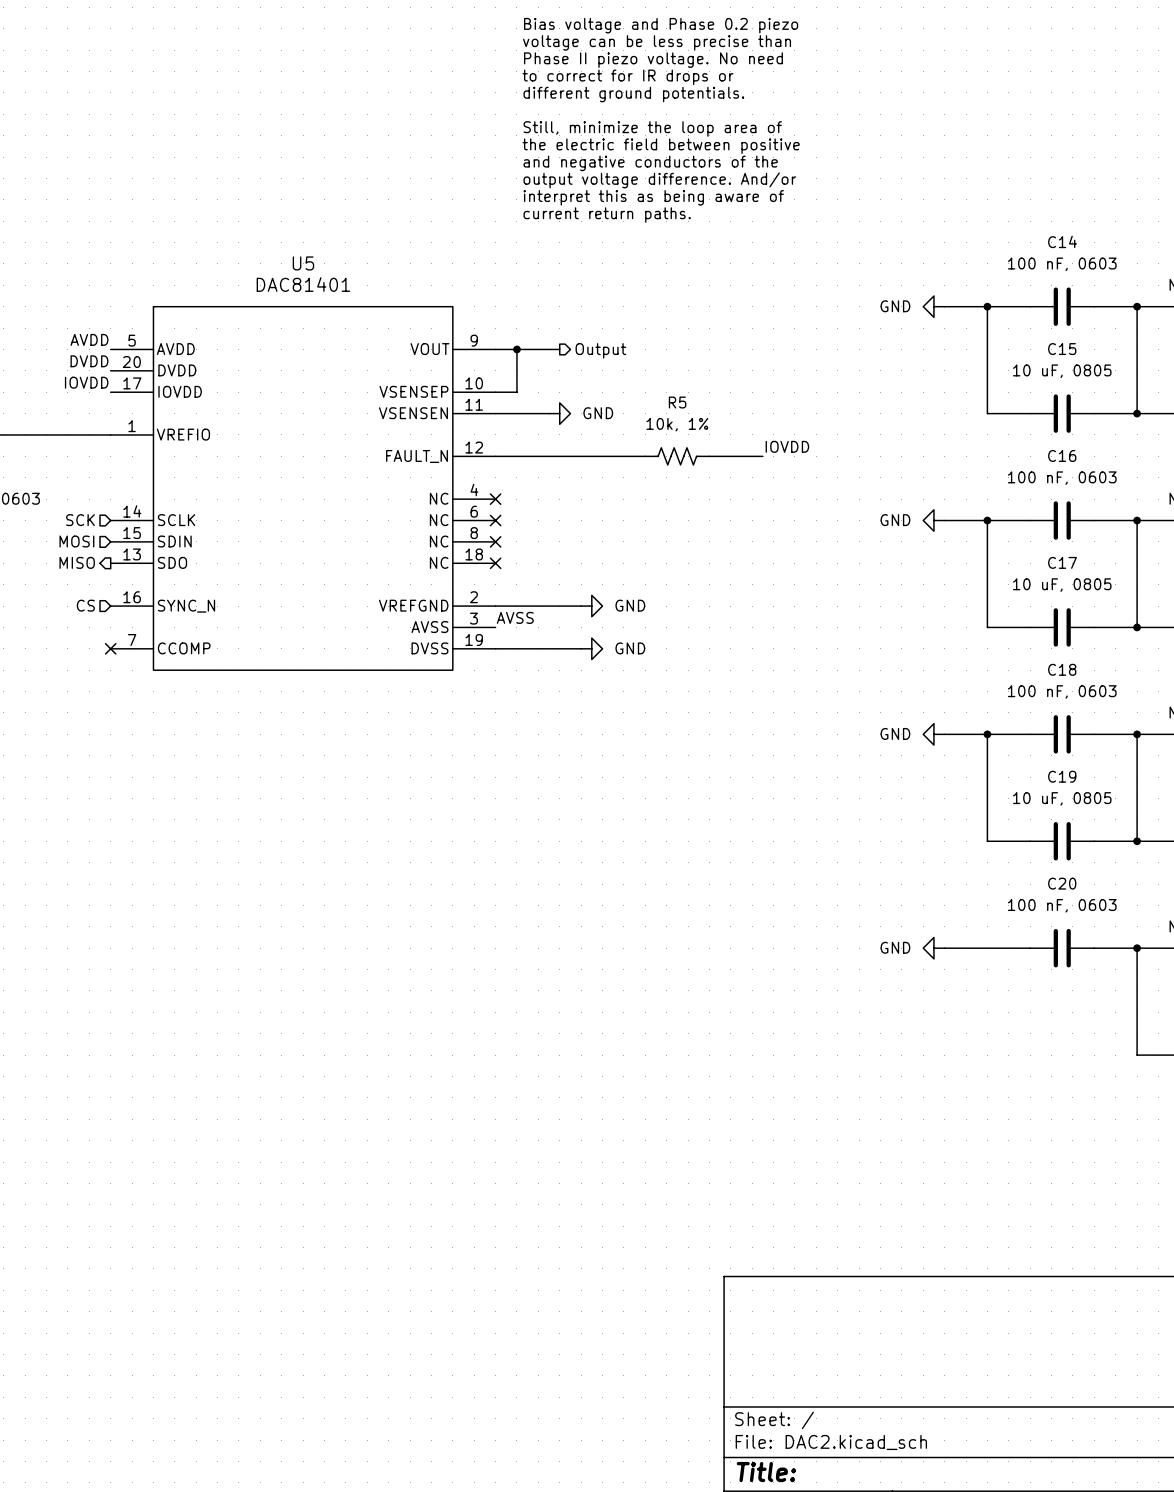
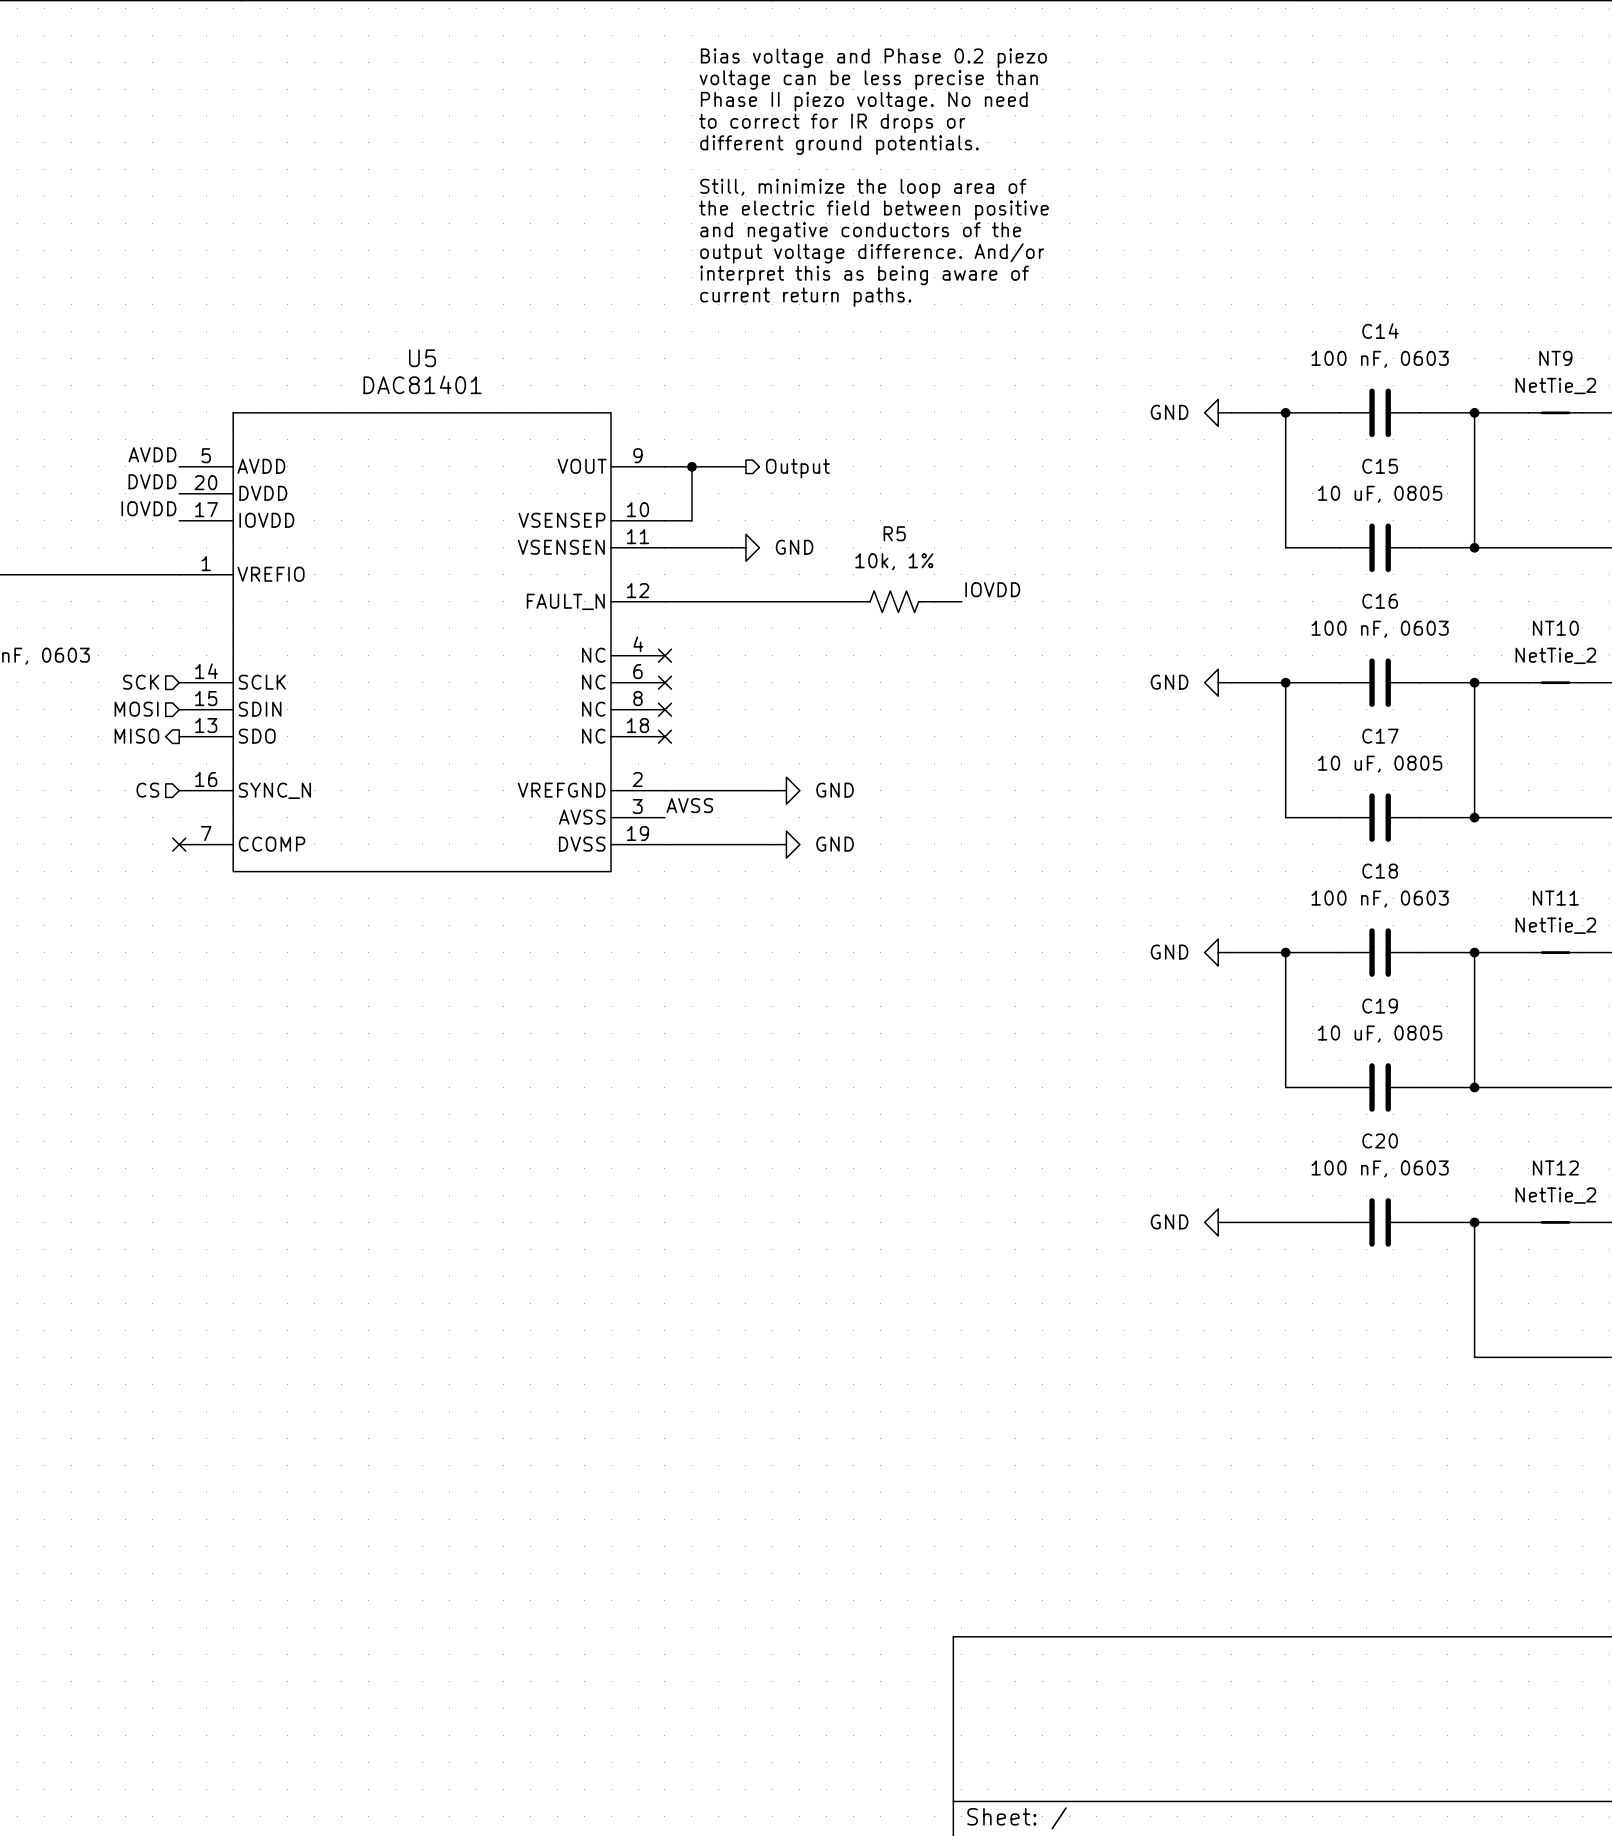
label position: IOVDD (787, 446) -> IOVDD (992, 589)
wire: (730, 456) (762, 456) -> none

